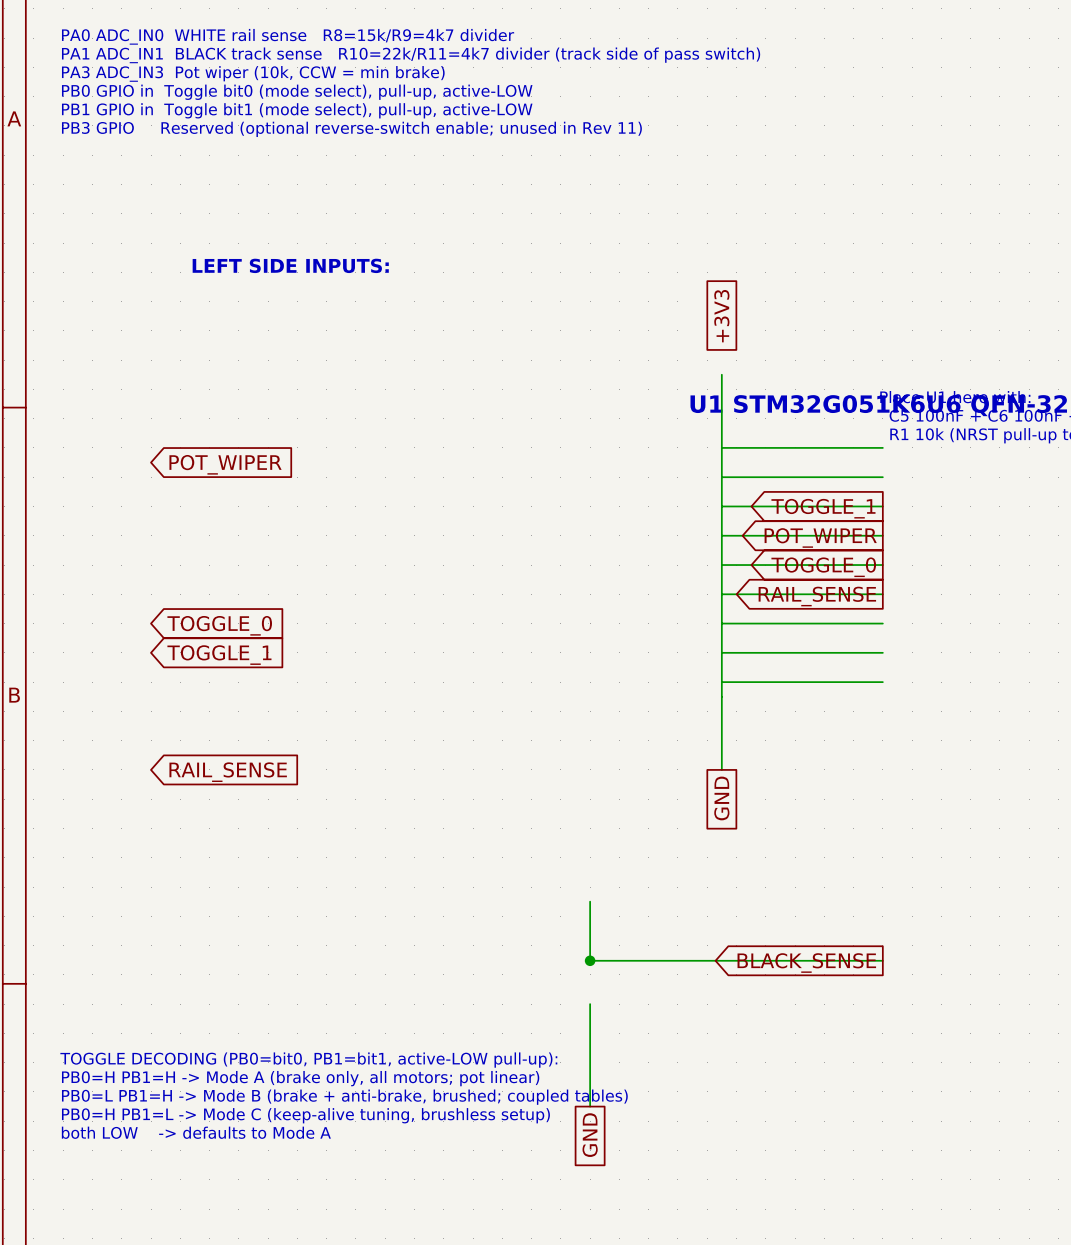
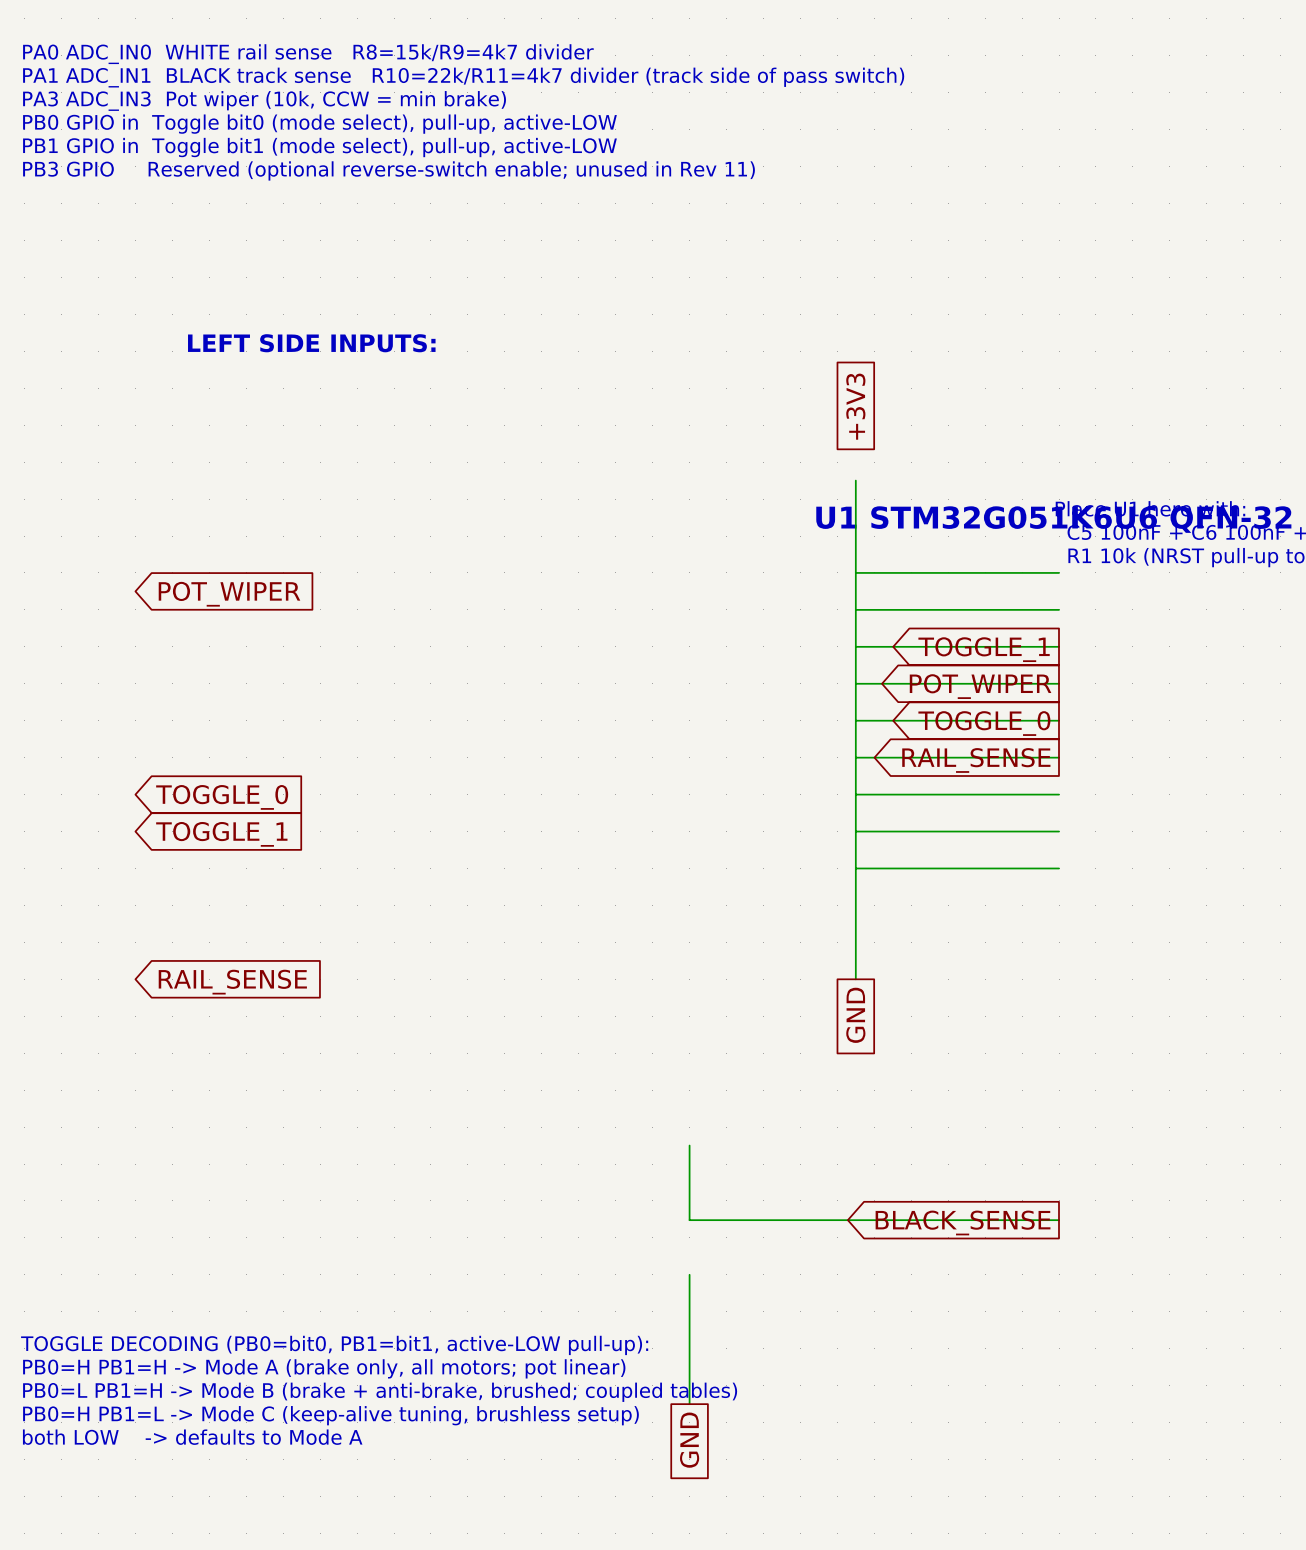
junction: (590, 960) -> none

